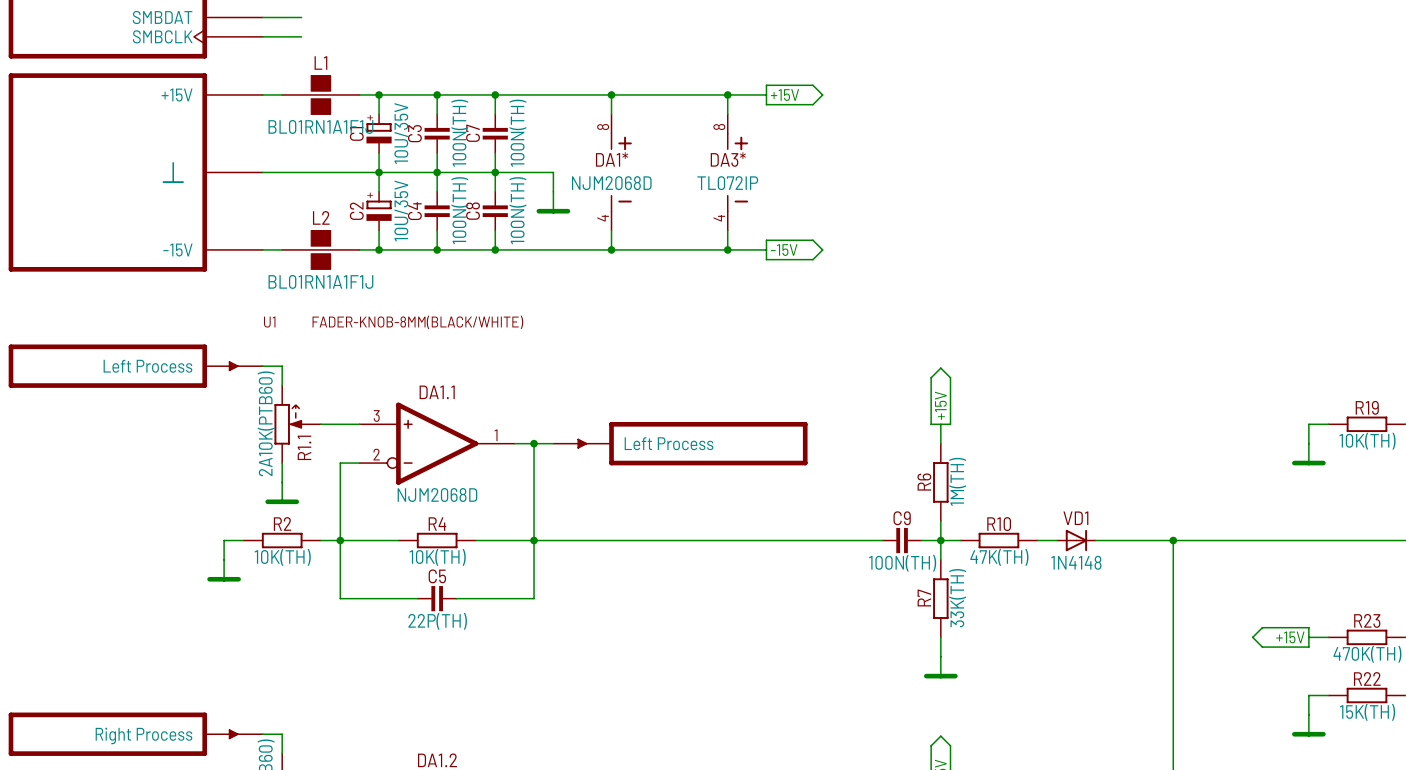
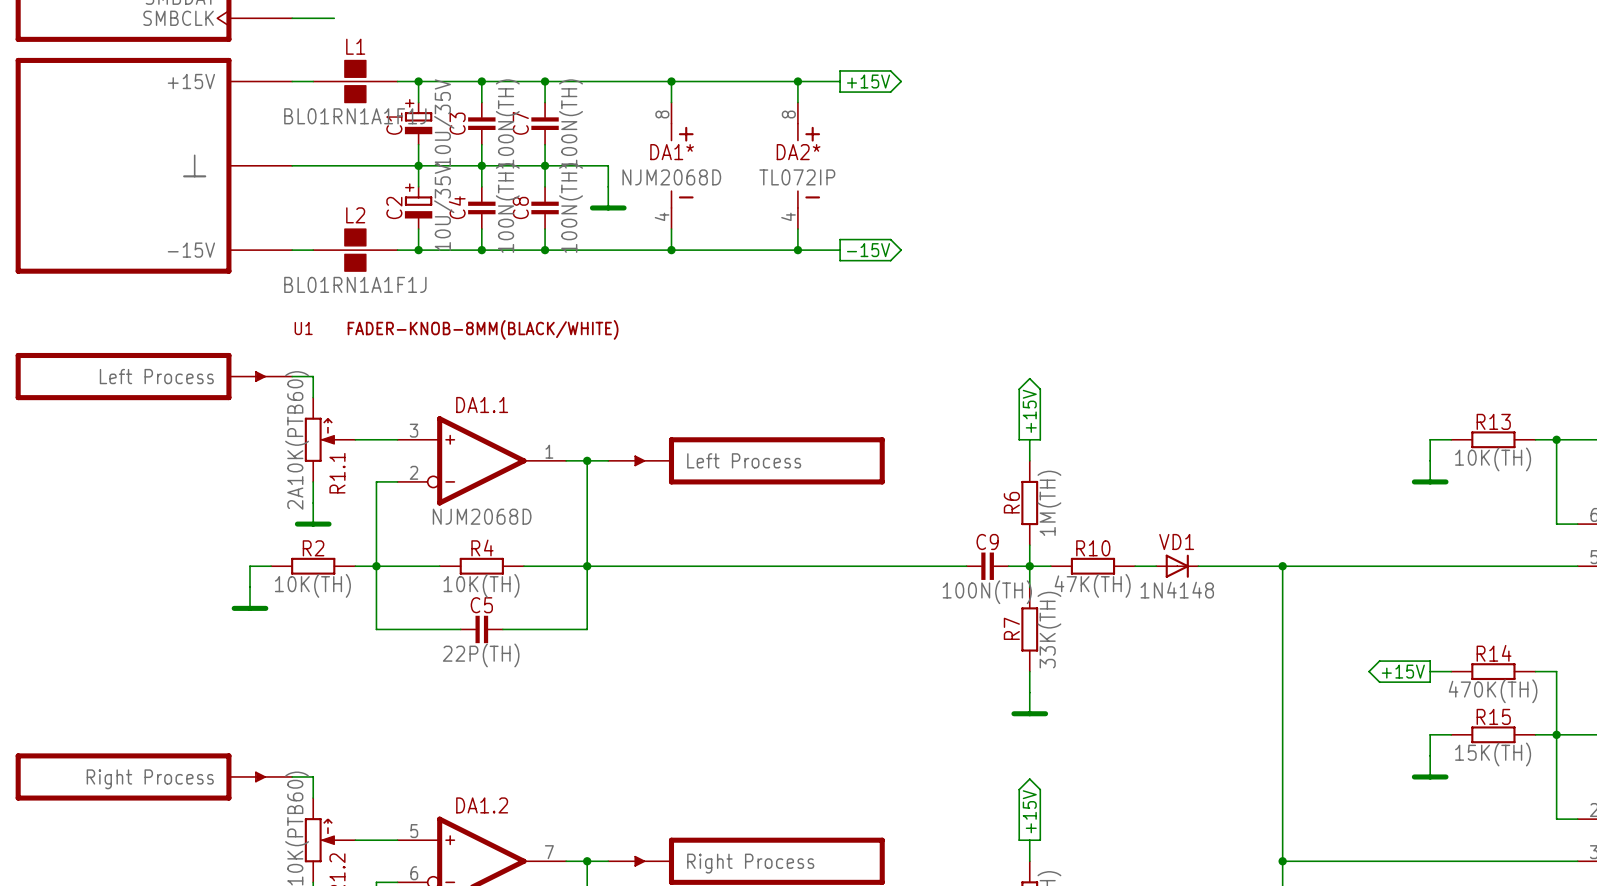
DA3* name: DA3* (728, 159) -> DA2* (798, 152)
R19 name: R19 (1367, 407) -> R13 (1493, 421)
R23 name: R23 (1367, 620) -> R14 (1494, 653)
R22 name: R22 (1367, 678) -> R15 (1493, 716)

